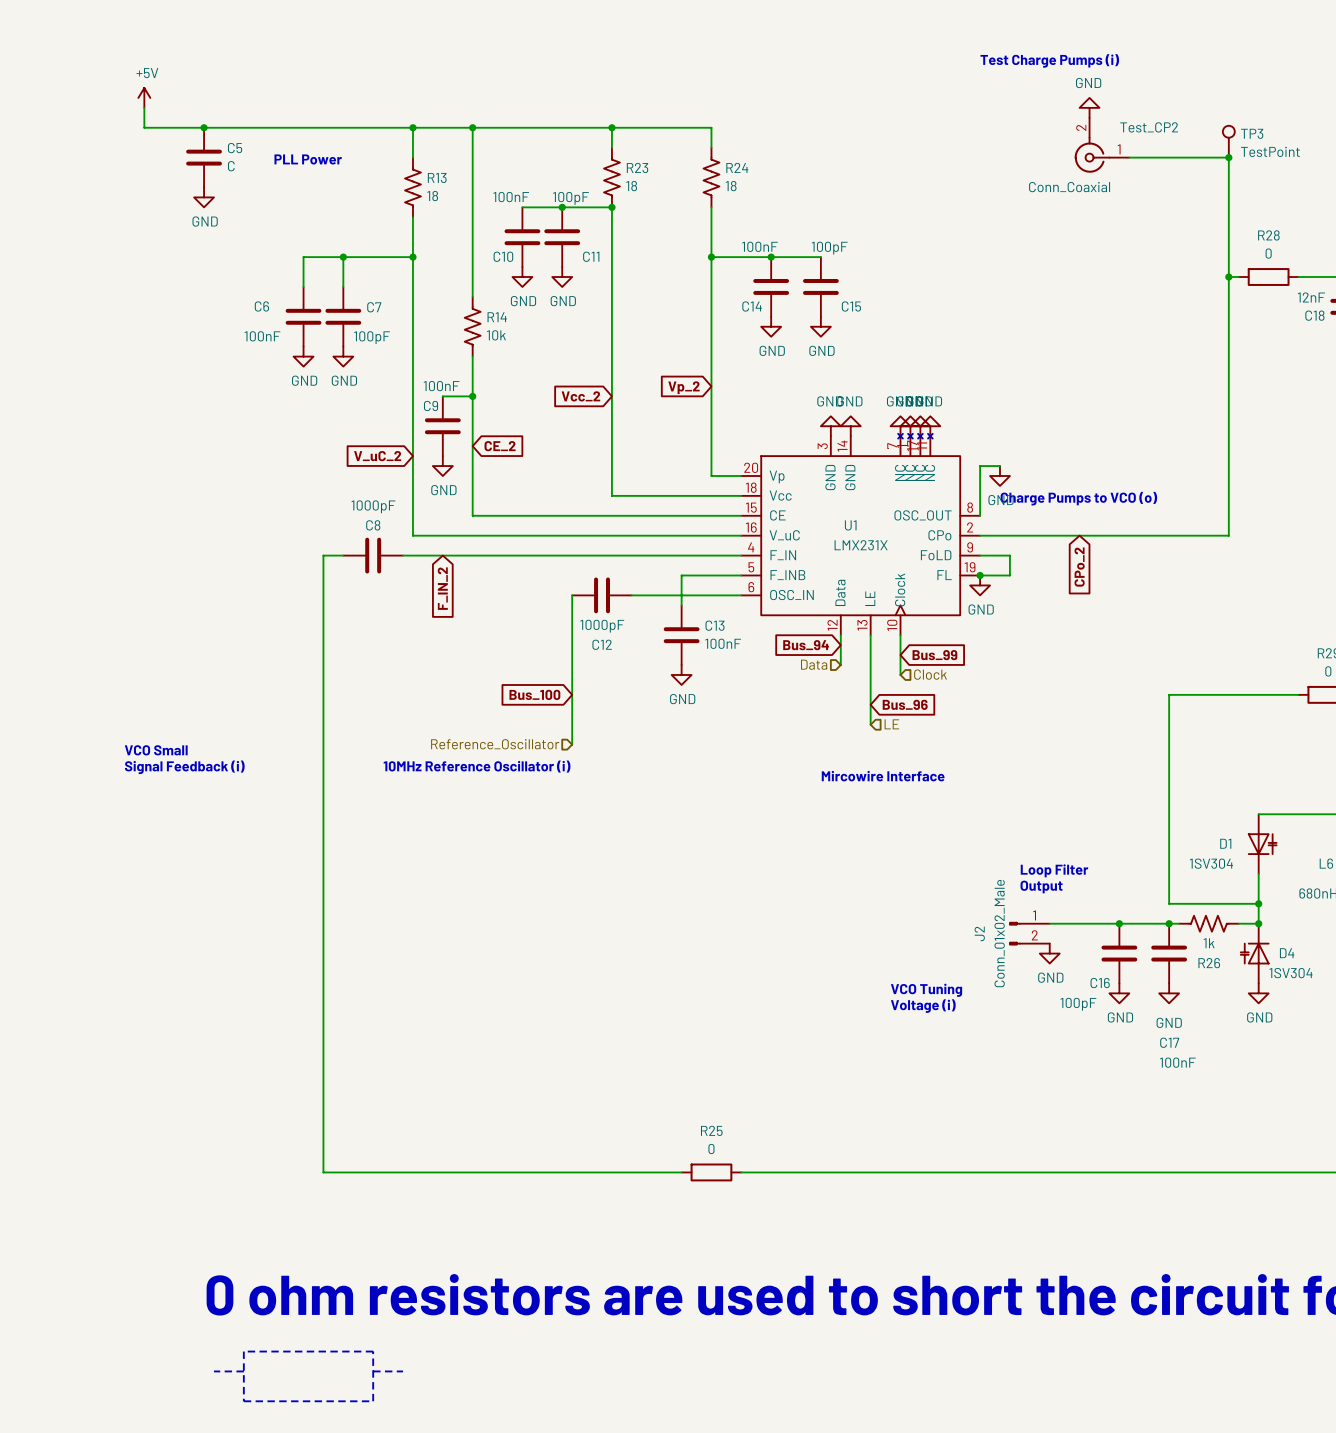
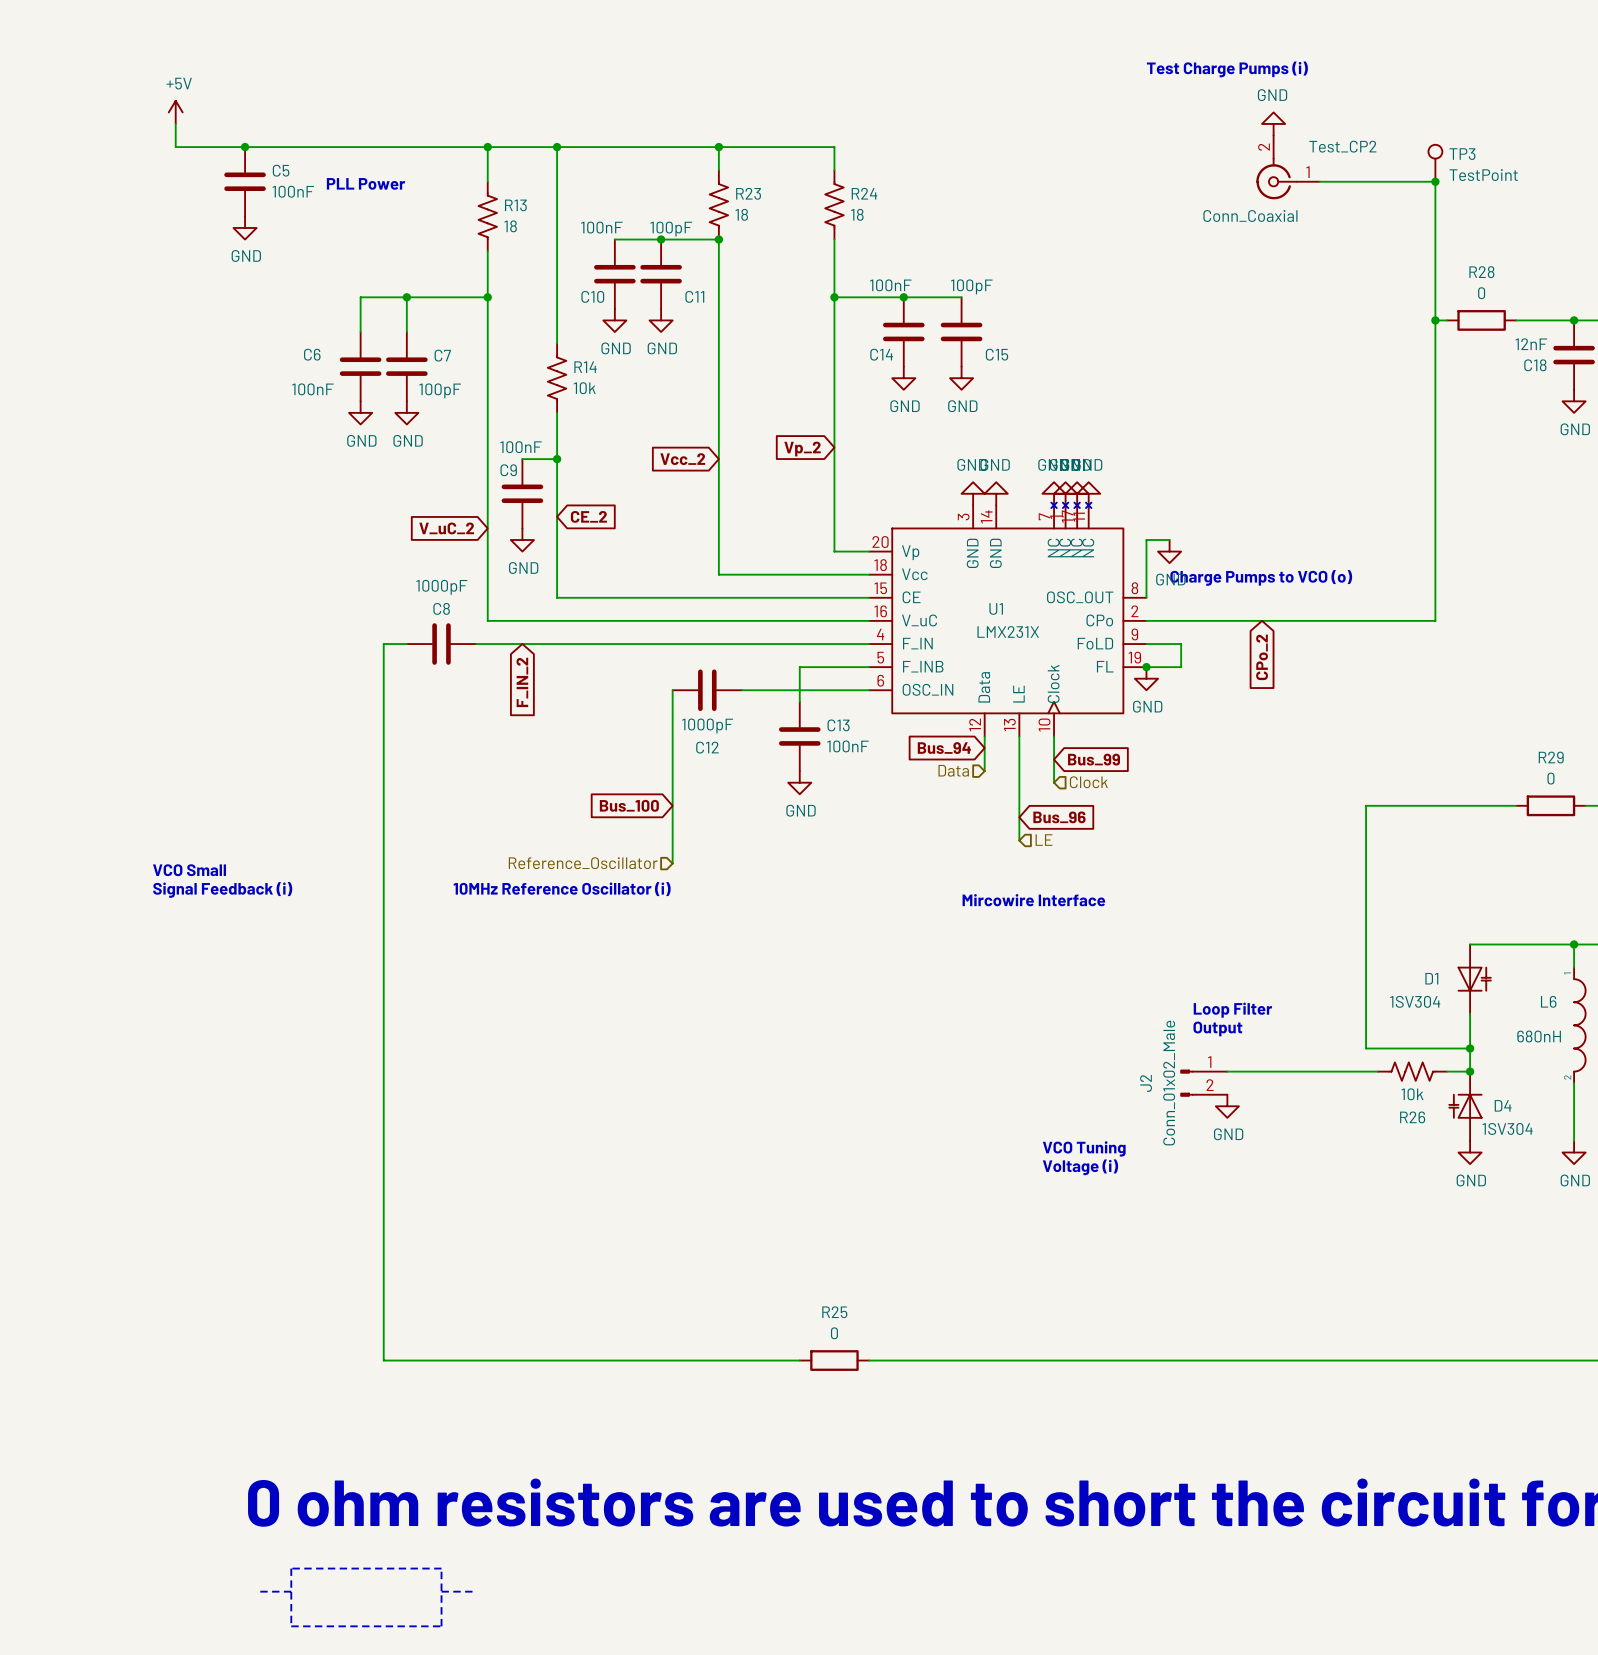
C5 value: C (231, 166) -> 100nF (293, 191)
junction: (1119, 923) -> none
junction: (1169, 923) -> none
R26 value: 1k (1209, 943) -> 10k (1412, 1094)
C16: 100pF (1119, 953) -> none
C17: 100nF (1169, 953) -> none
power symbol: GND (1119, 993) -> none
power symbol: GND (1169, 993) -> none

